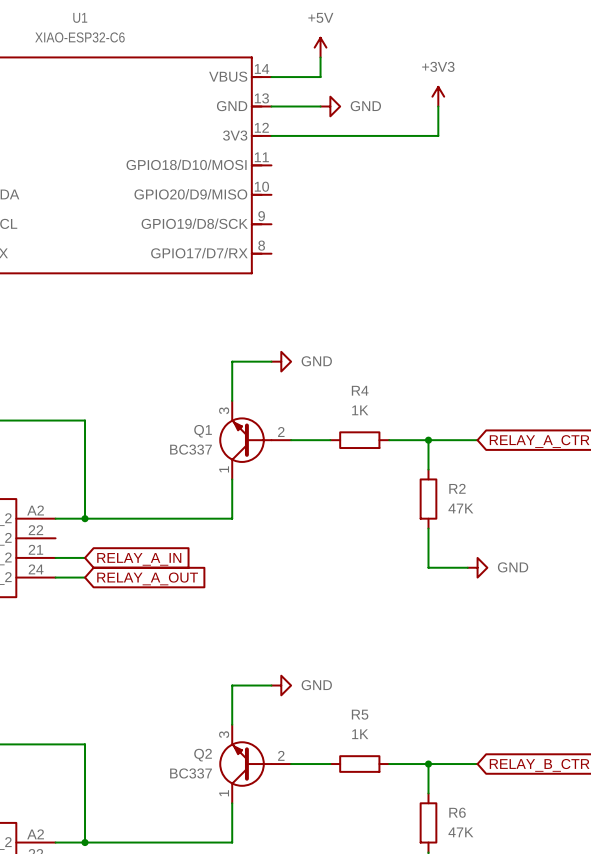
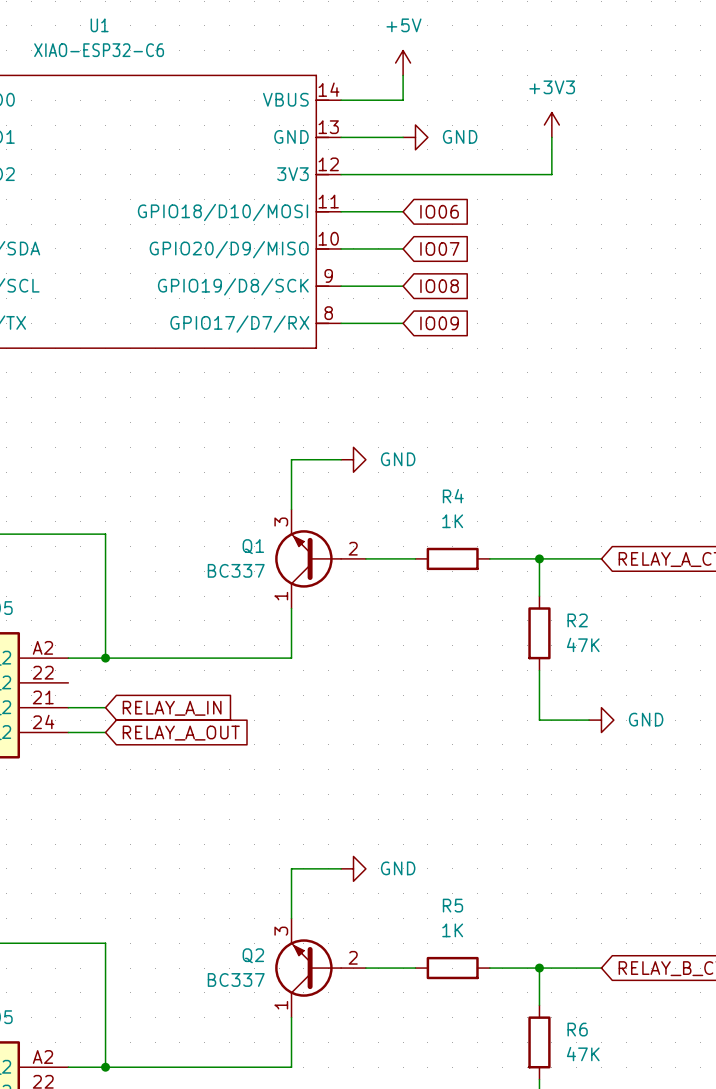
wire: none -> (341, 211) (403, 211)
global label: none -> IO06 (439, 211)
wire: none -> (341, 248) (403, 248)
global label: none -> IO07 (439, 248)
wire: none -> (341, 286) (403, 286)
global label: none -> IO08 (439, 286)
wire: none -> (341, 323) (403, 323)
global label: none -> IO09 (439, 323)

